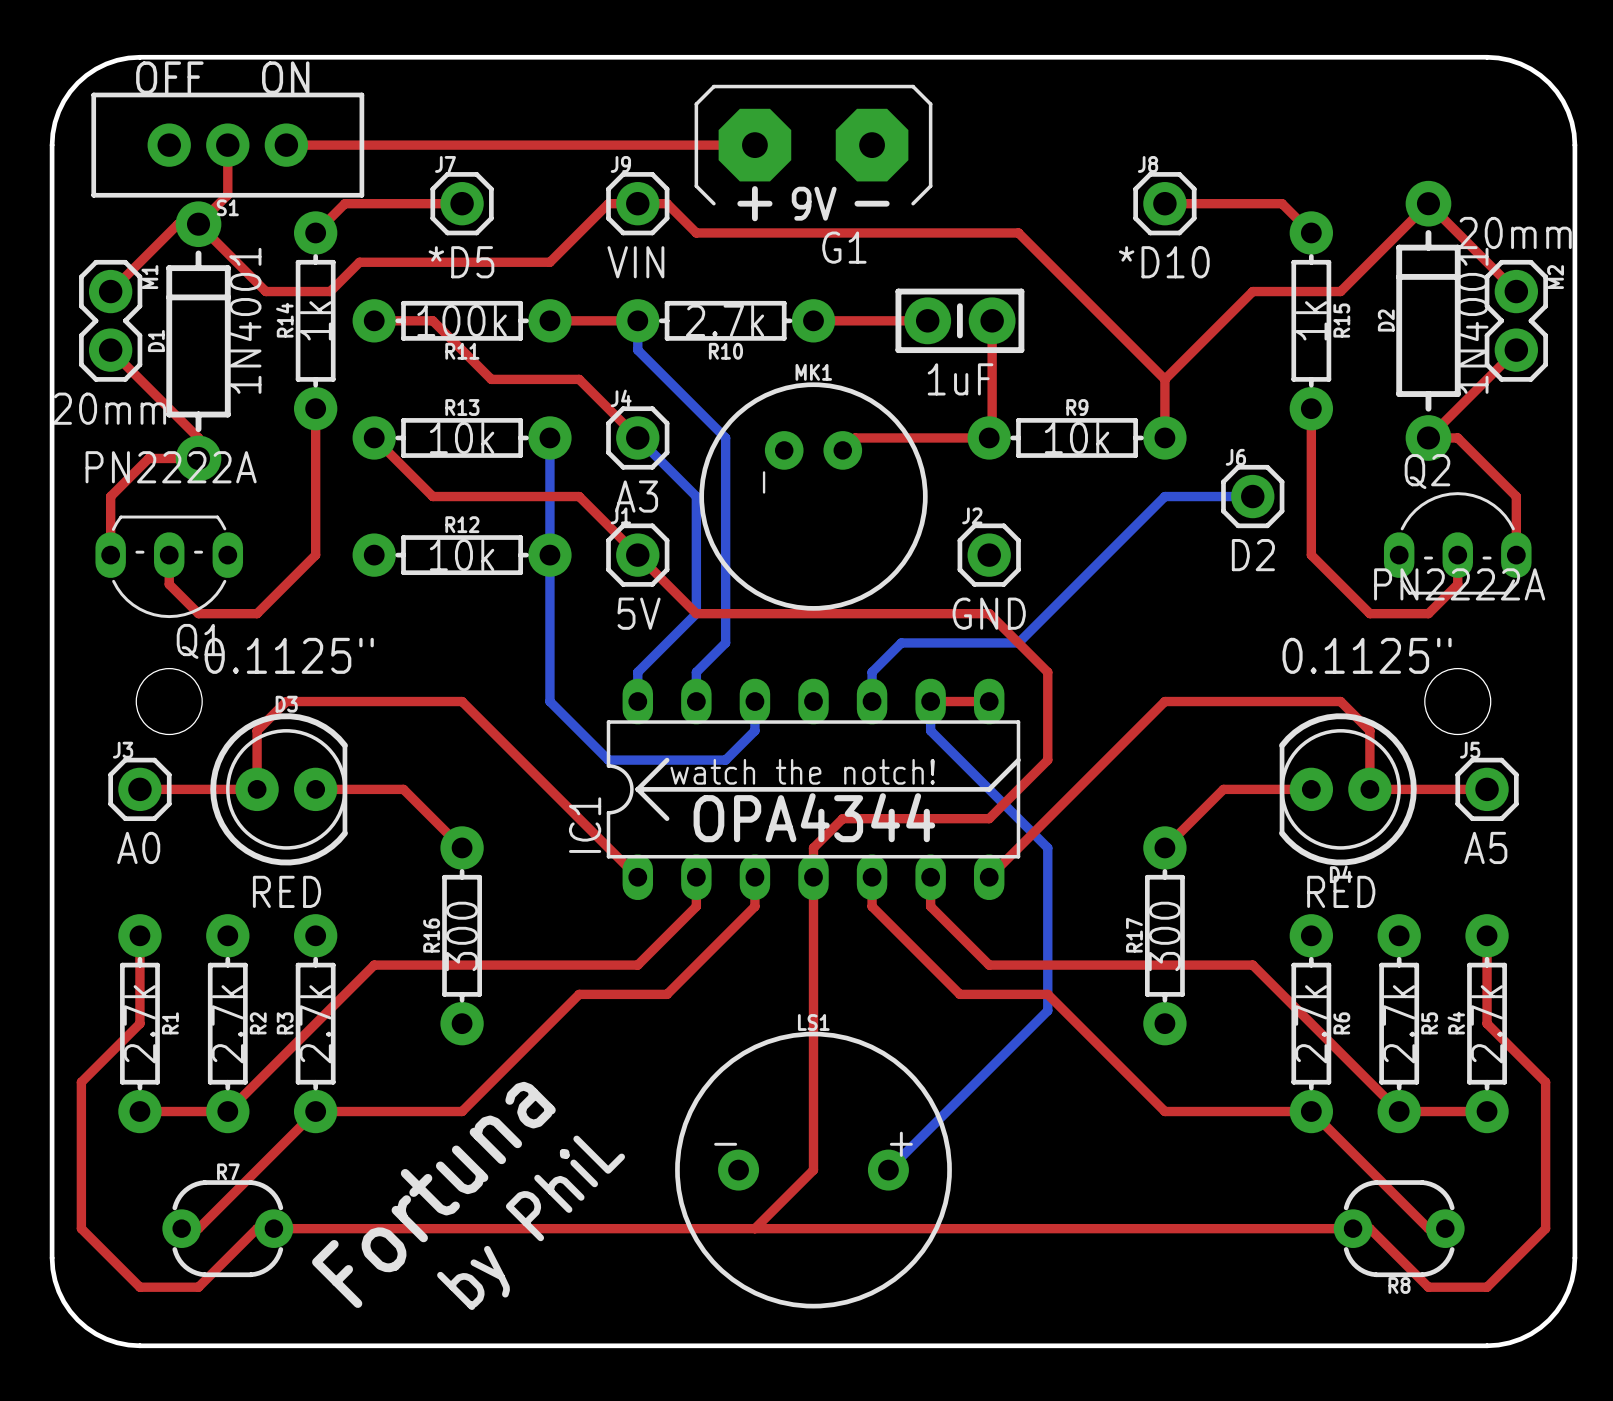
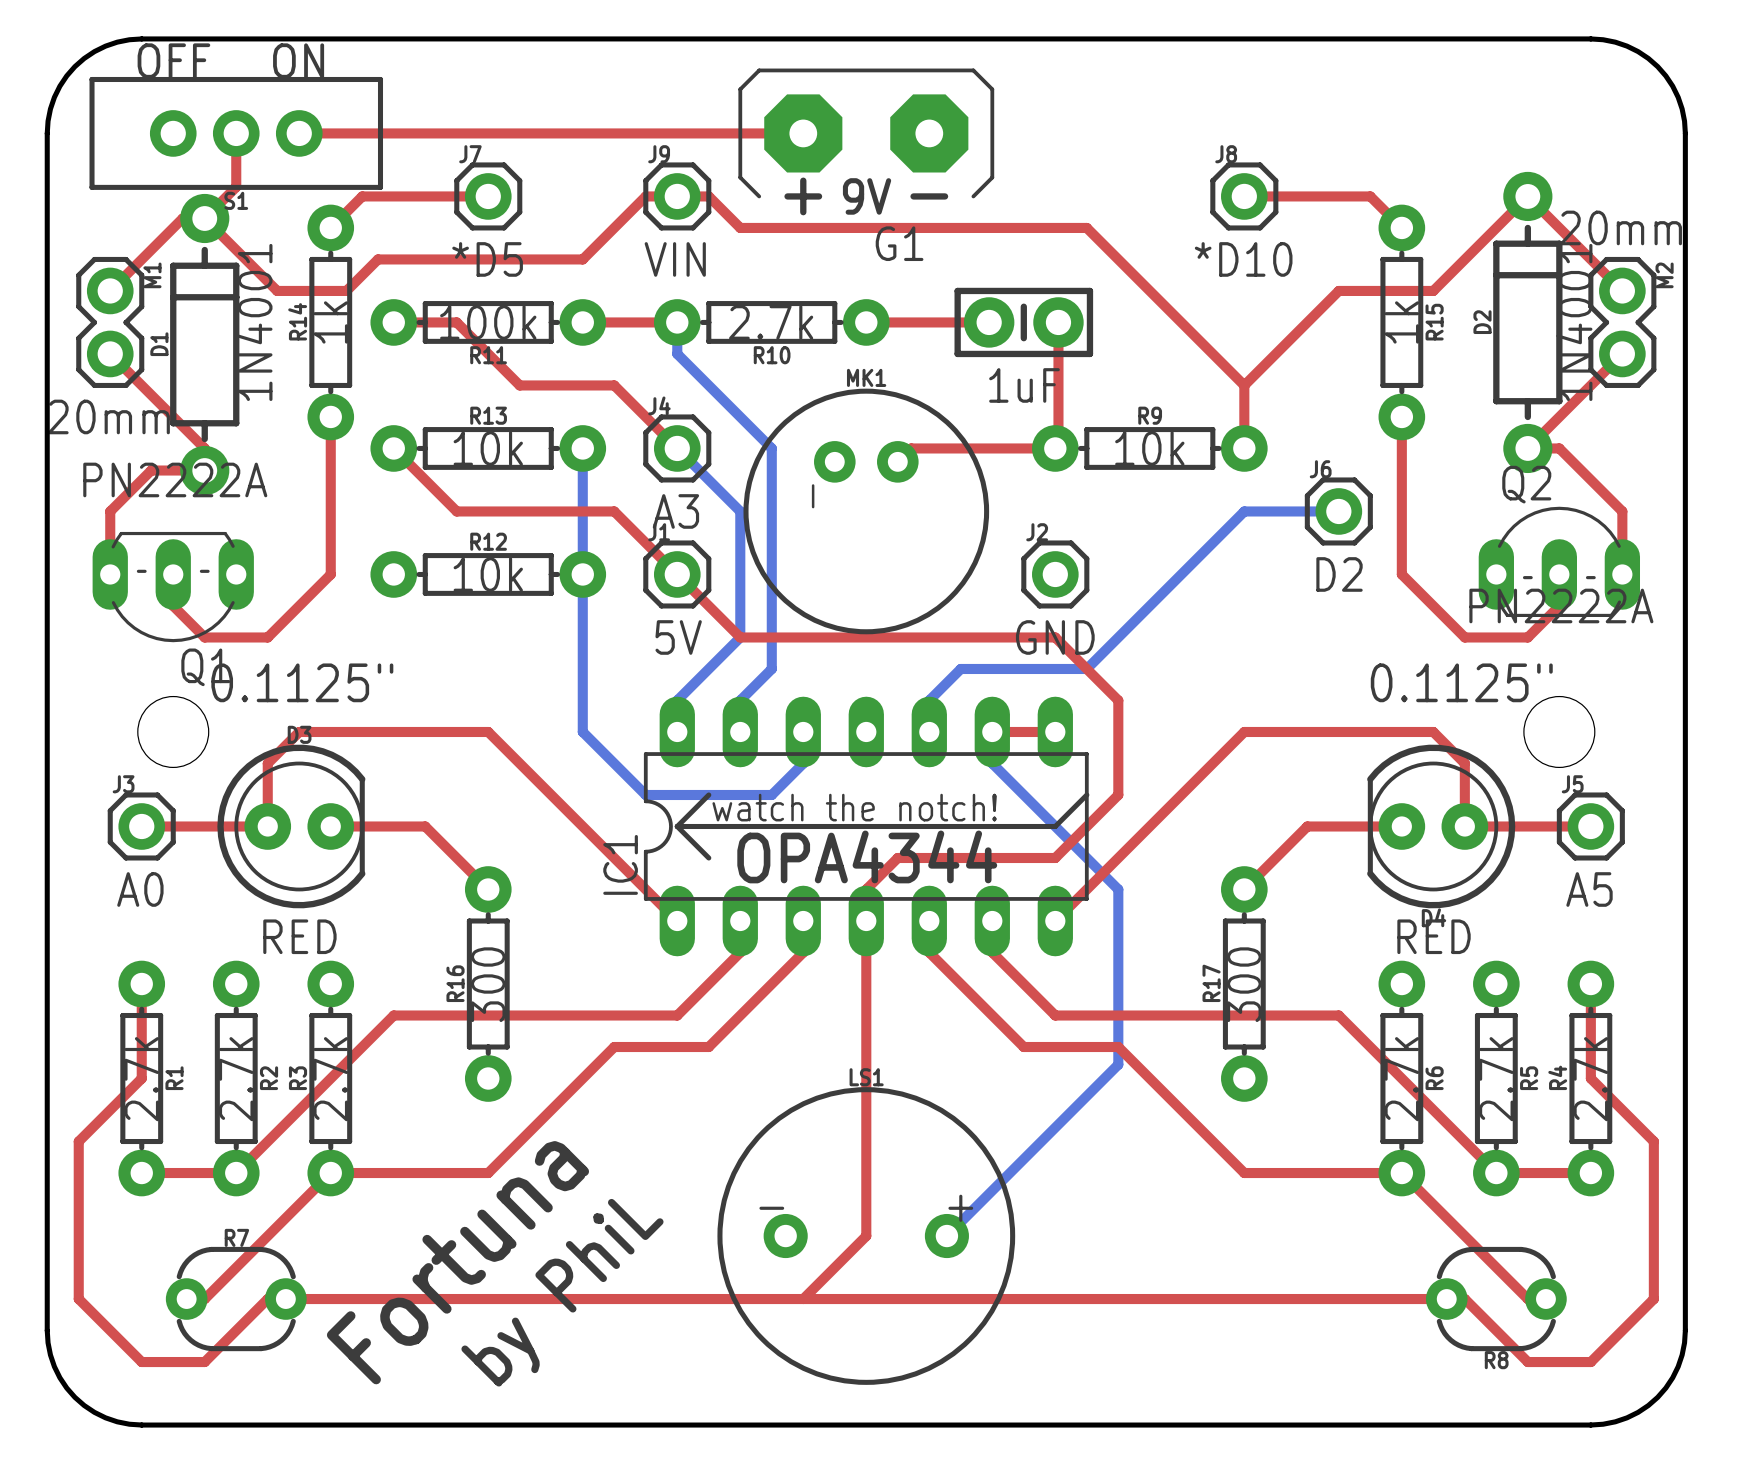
Q2 footprint: [1383, 492, 1532, 595] -> [1478, 506, 1641, 618]
Q1 footprint: [95, 515, 244, 619] -> [92, 531, 254, 643]
IC1 footprint: [606, 678, 1021, 901] -> [643, 696, 1089, 957]

